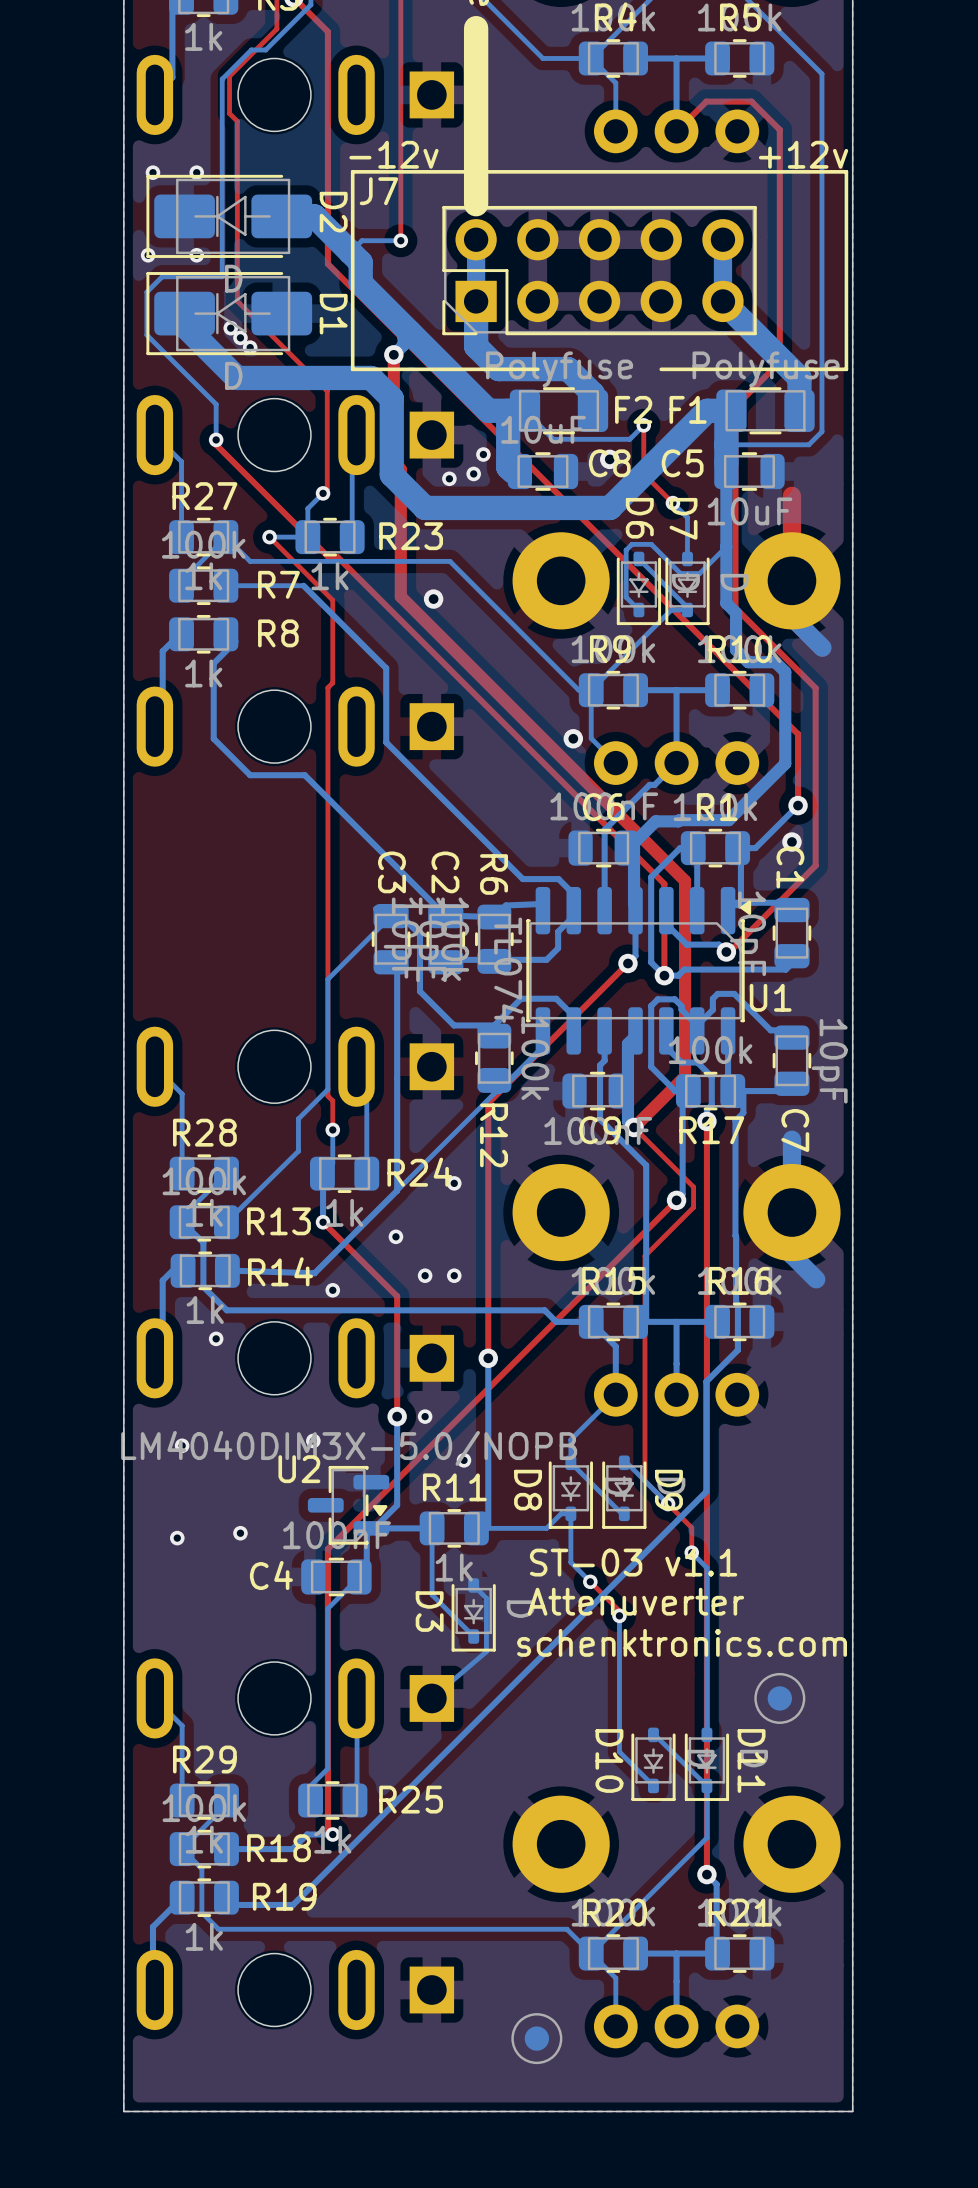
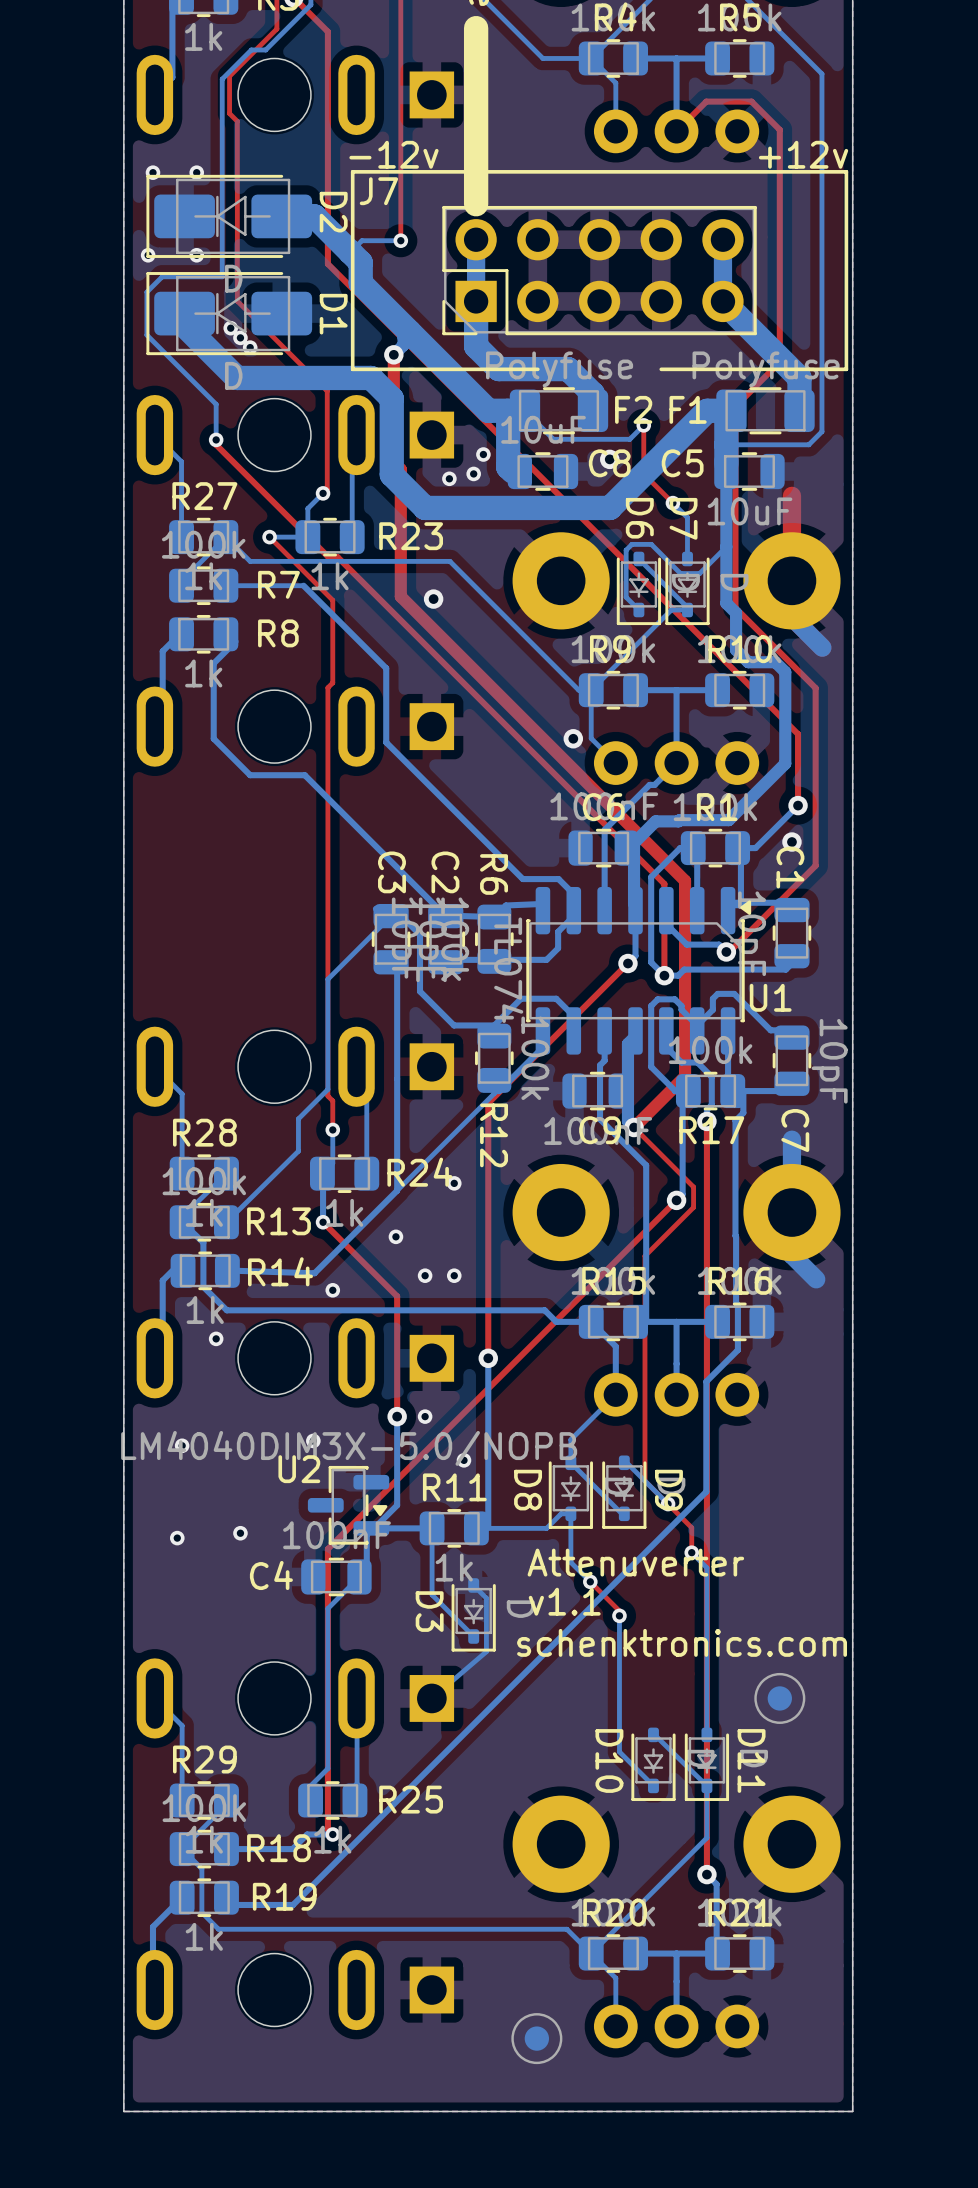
text: ST-03 v1.1 (633, 1562) -> Attenuverter (635, 1562)
text: Attenuverter (635, 1601) -> v1.1 (564, 1601)

